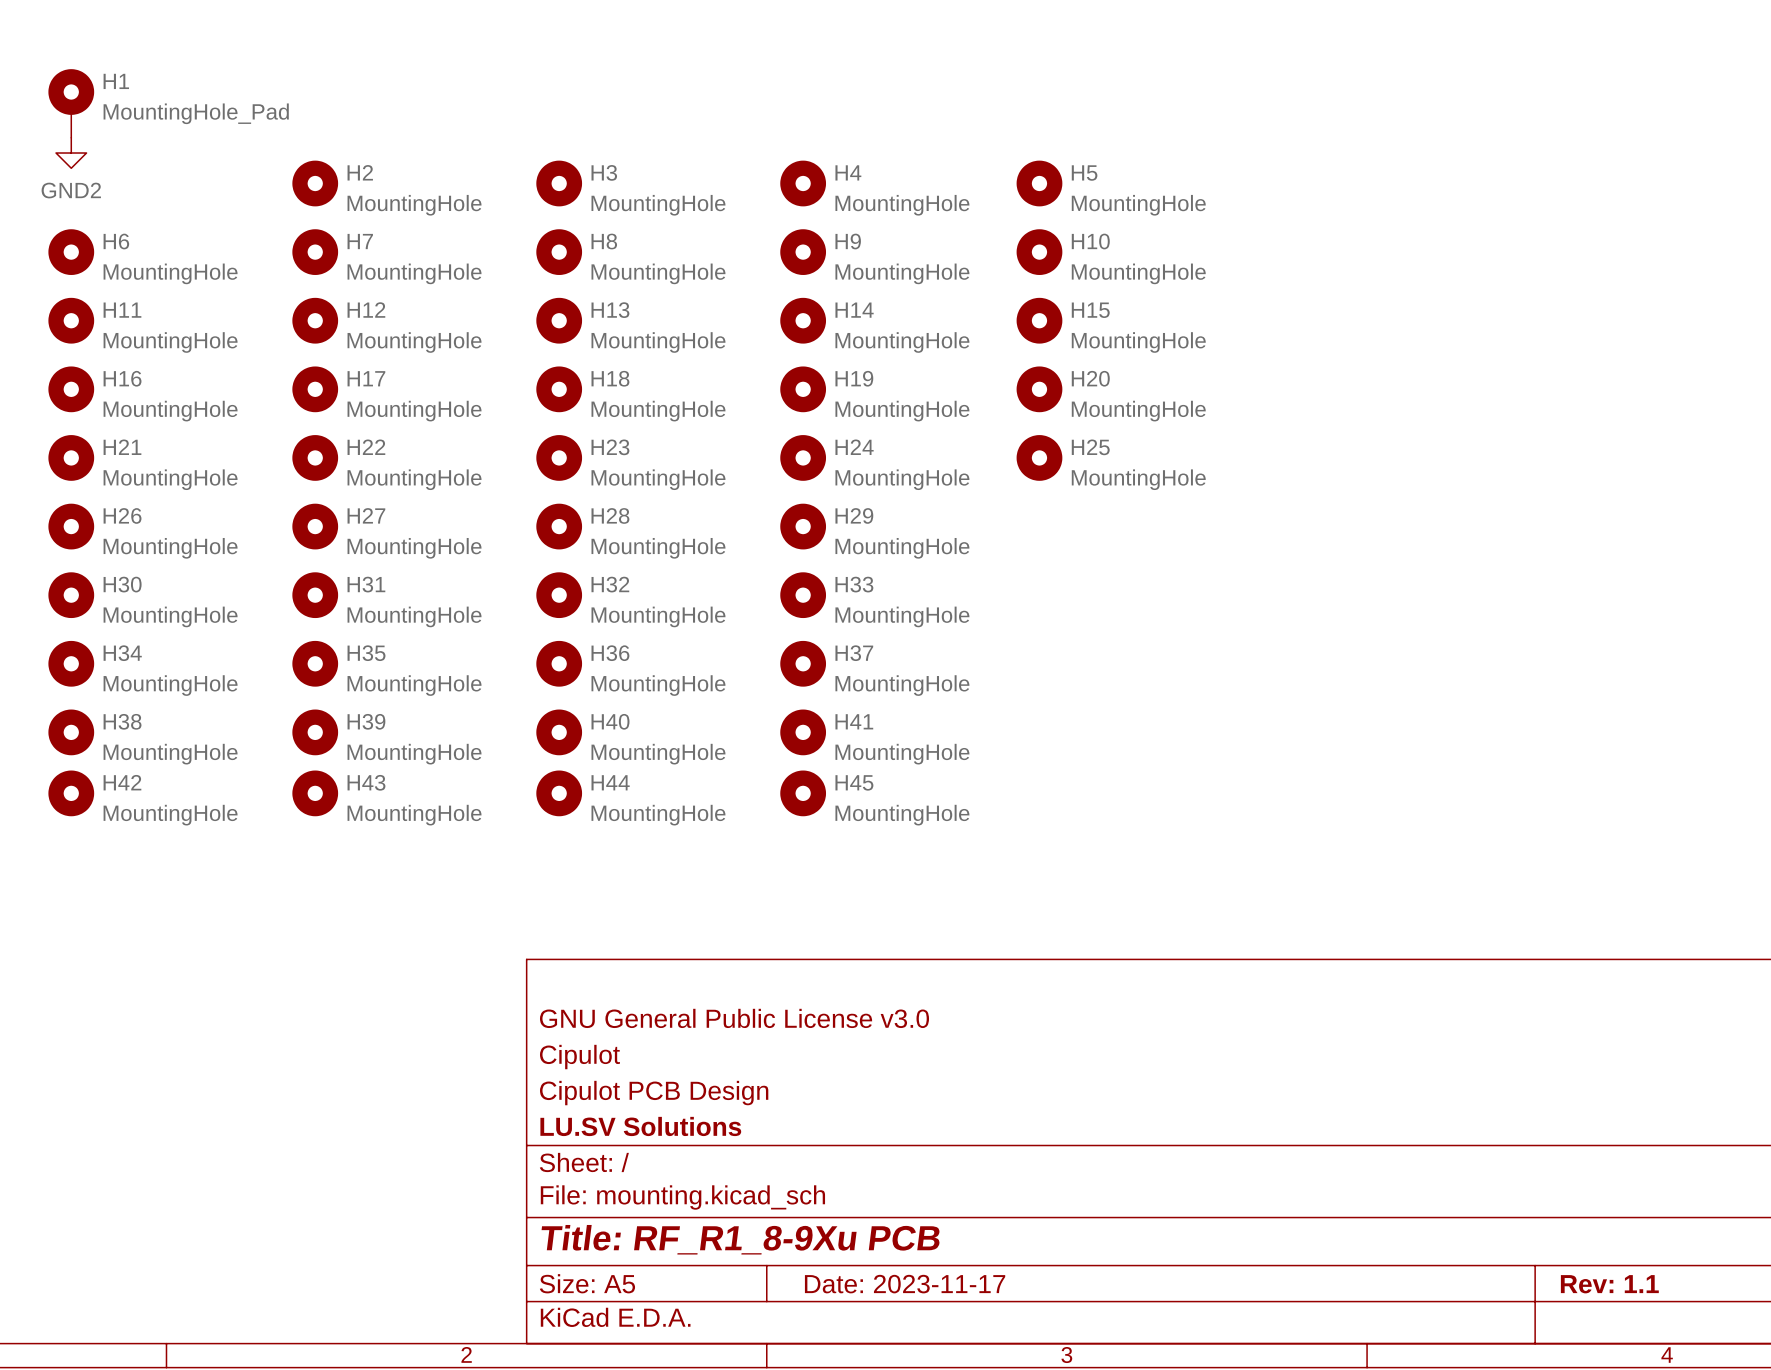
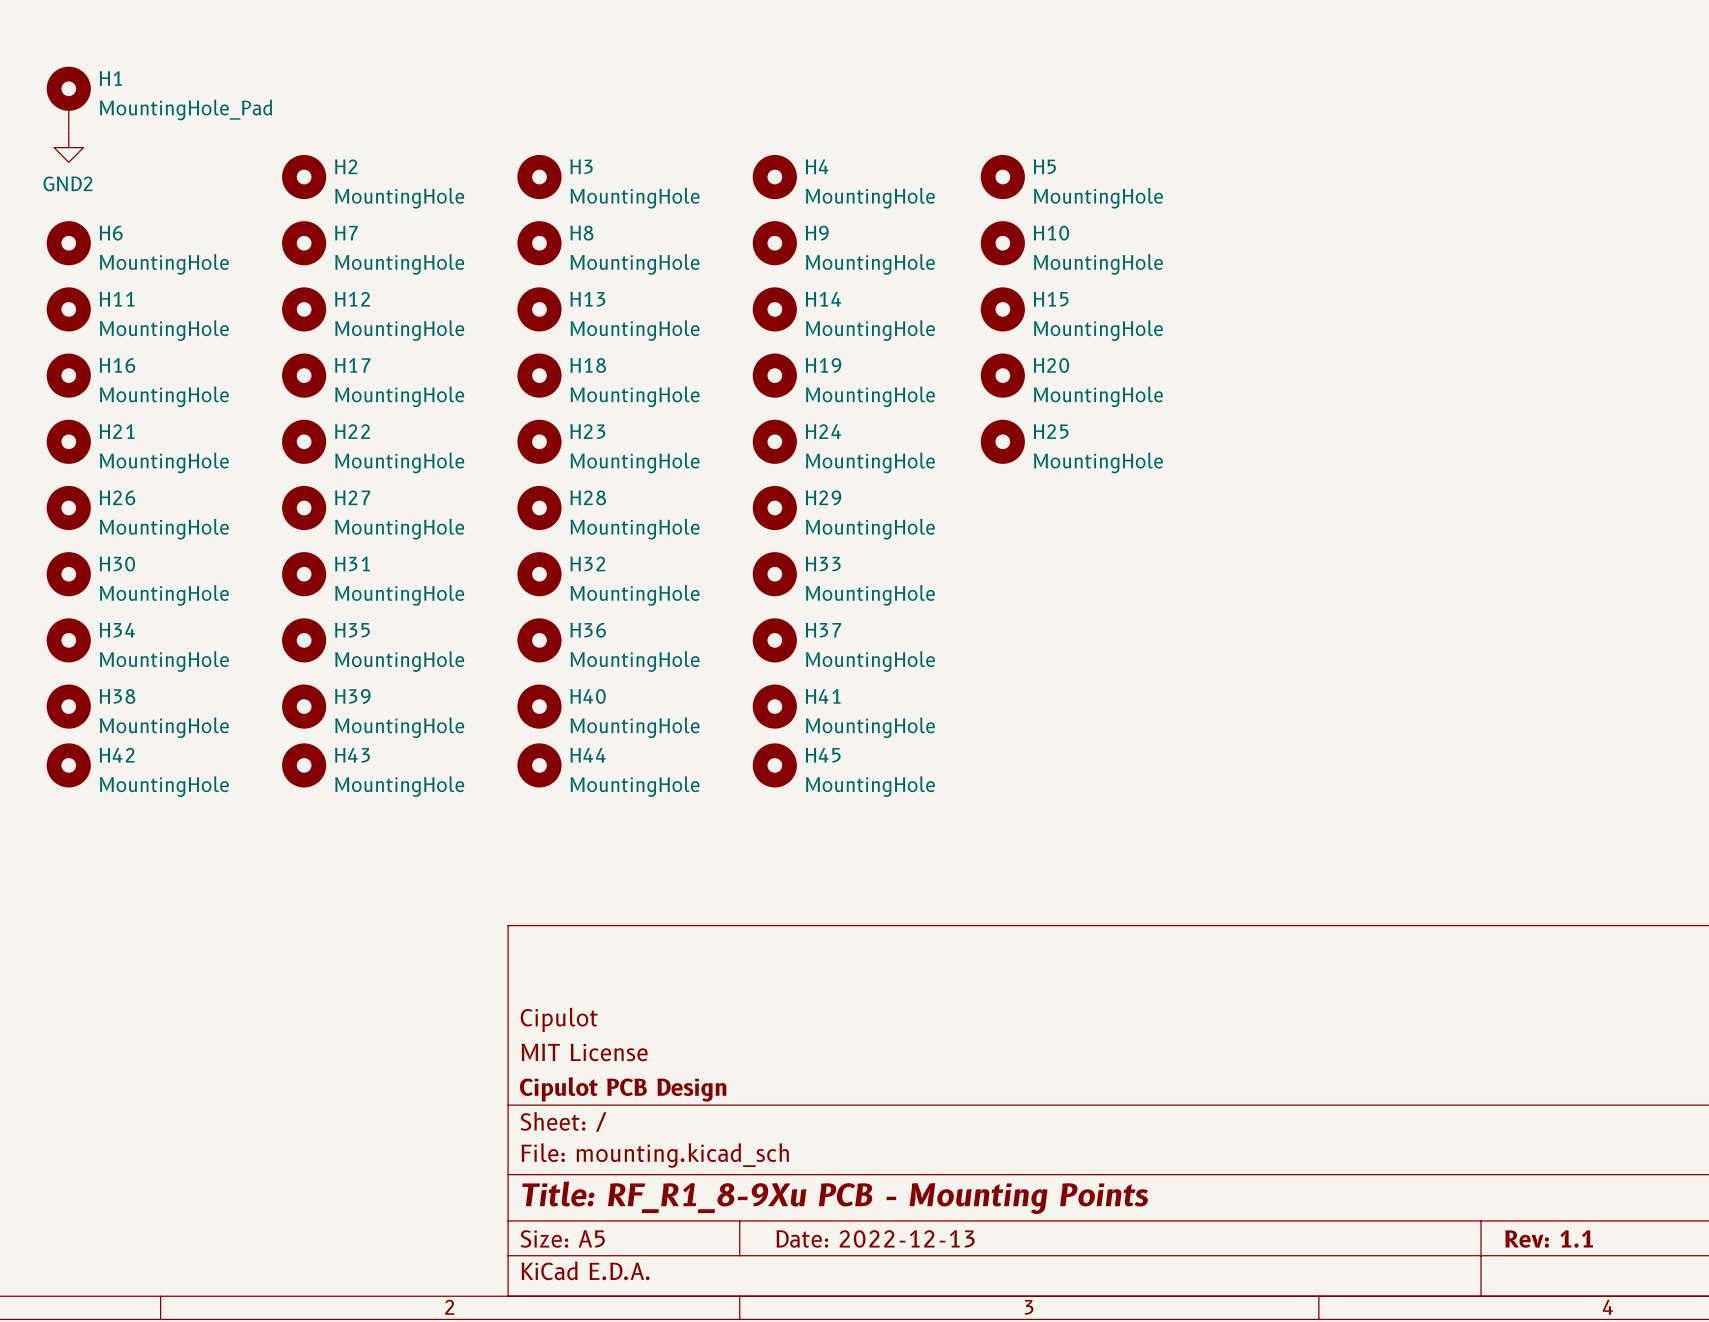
title block: GNU General Public License v3.0 (734, 1018) -> none
title block: Cipulot PCB Design (654, 1093) -> MIT License (584, 1052)
title block: LU.SV Solutions (640, 1126) -> Cipulot PCB Design (623, 1089)
title block: Title: RF_R1_8-9Xu PCB (740, 1239) -> Title: RF_R1_8-9Xu PCB - Mounting Points (835, 1197)
title block: Date: 2023-11-17 (905, 1284) -> Date: 2022-12-13 (875, 1238)

